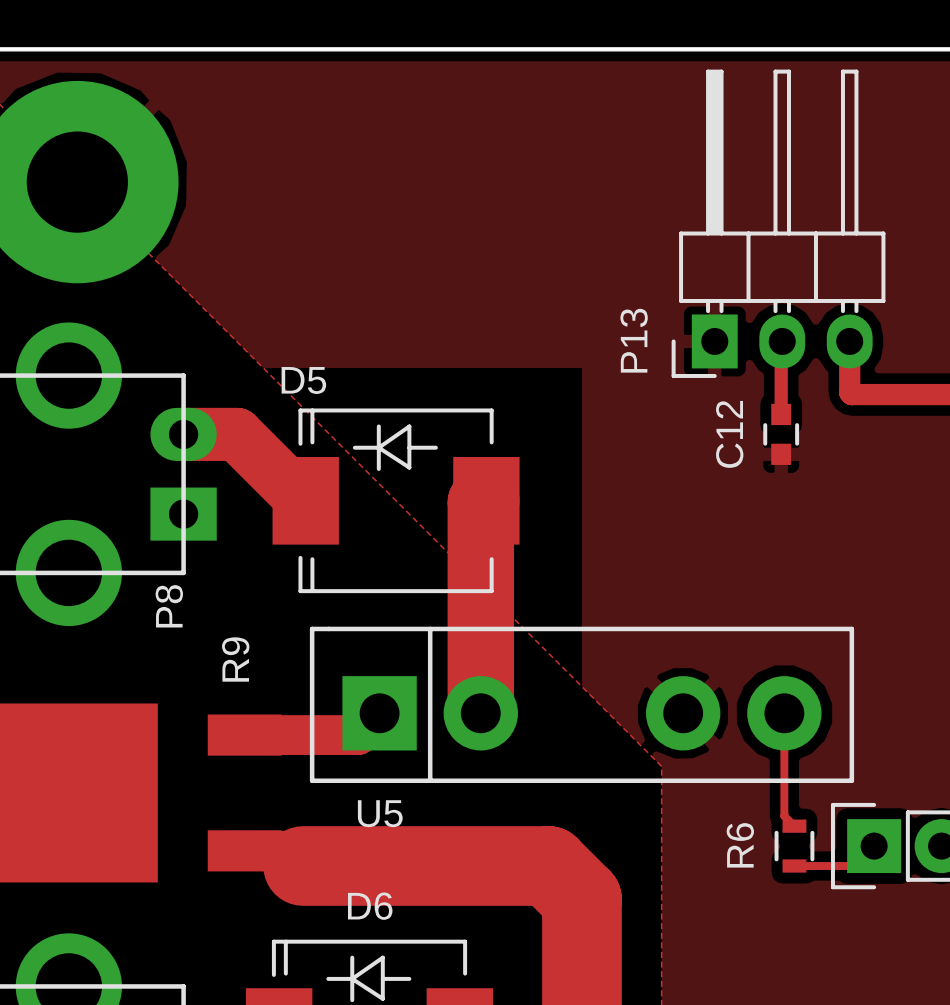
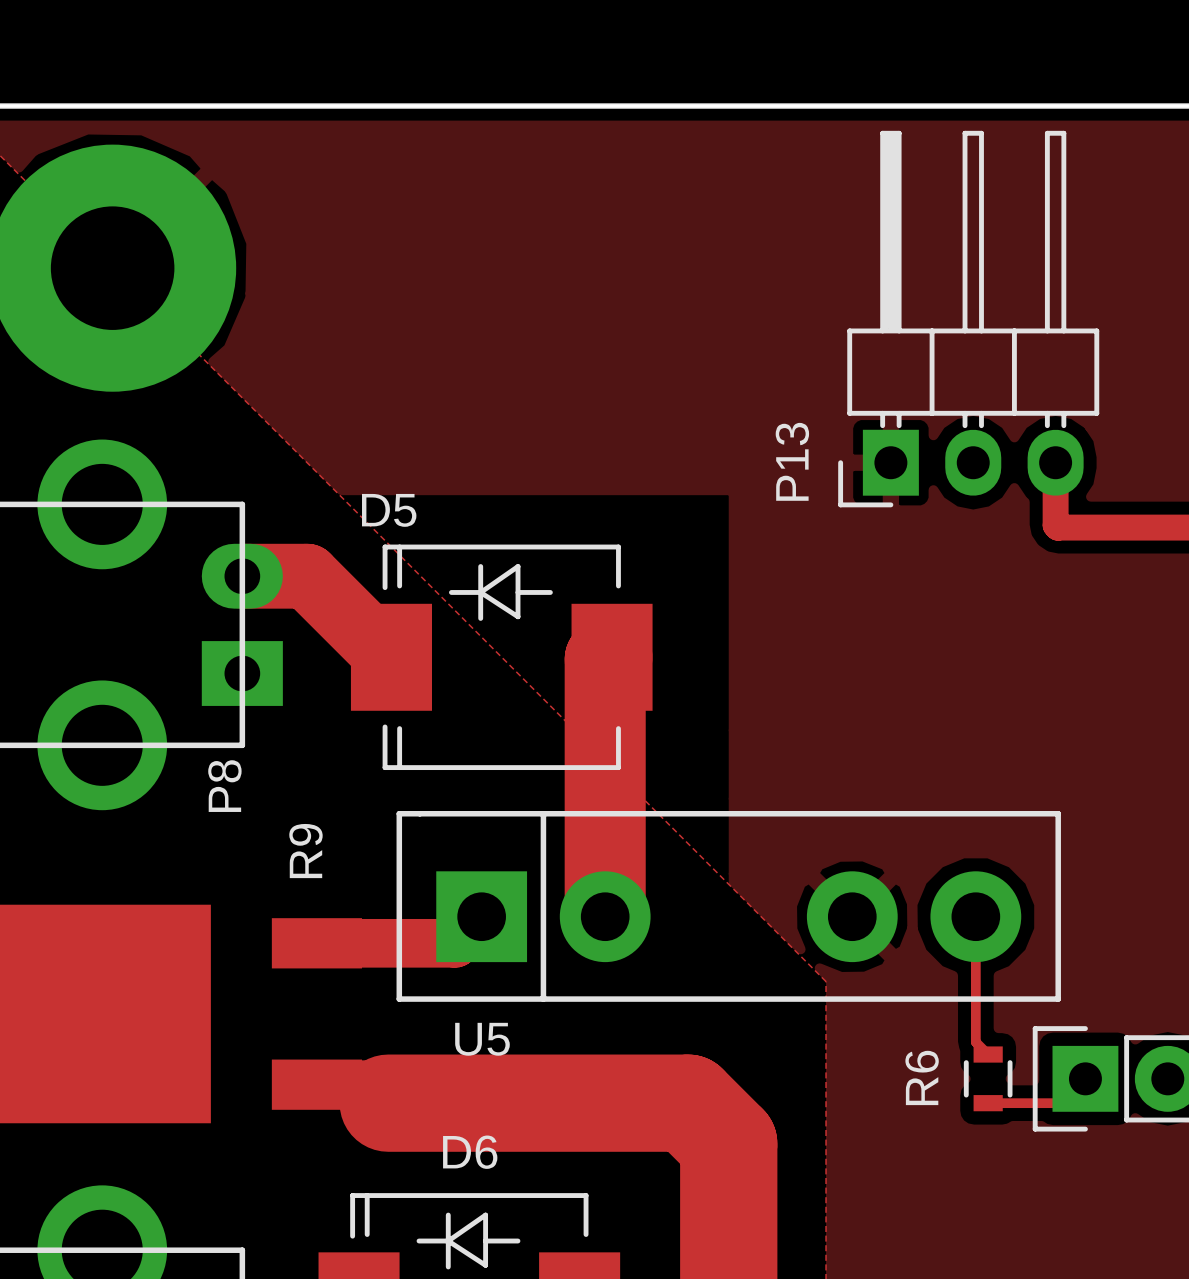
track: (782, 341) (781, 414) -> none
C12: (781, 434) -> none

